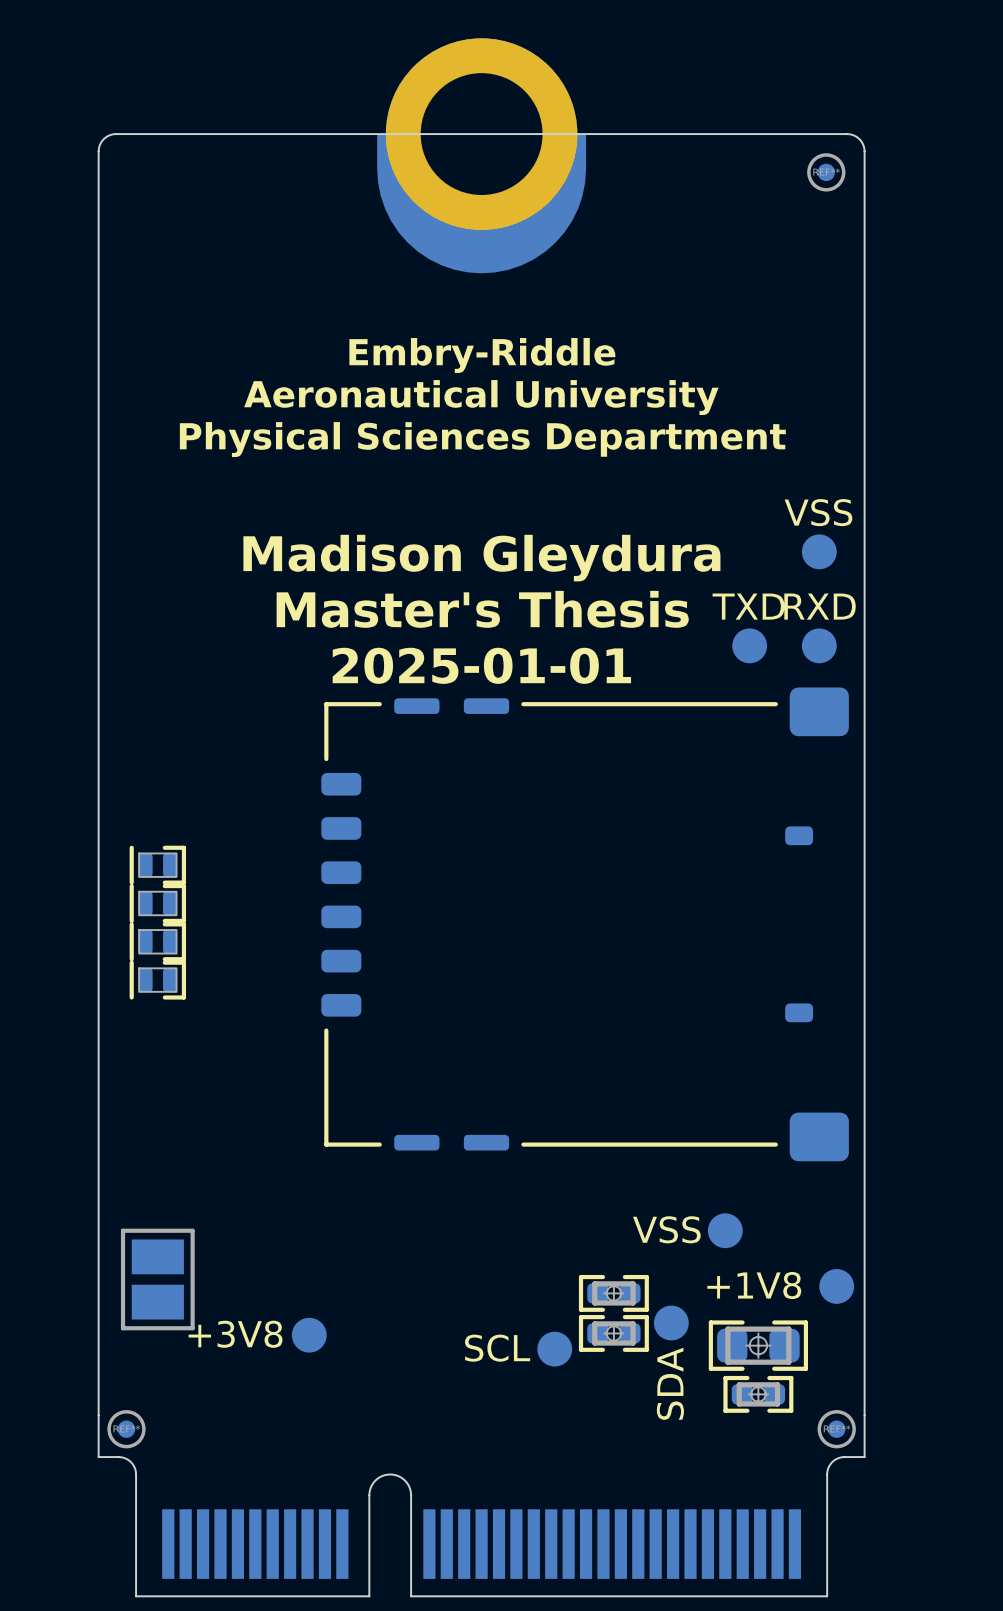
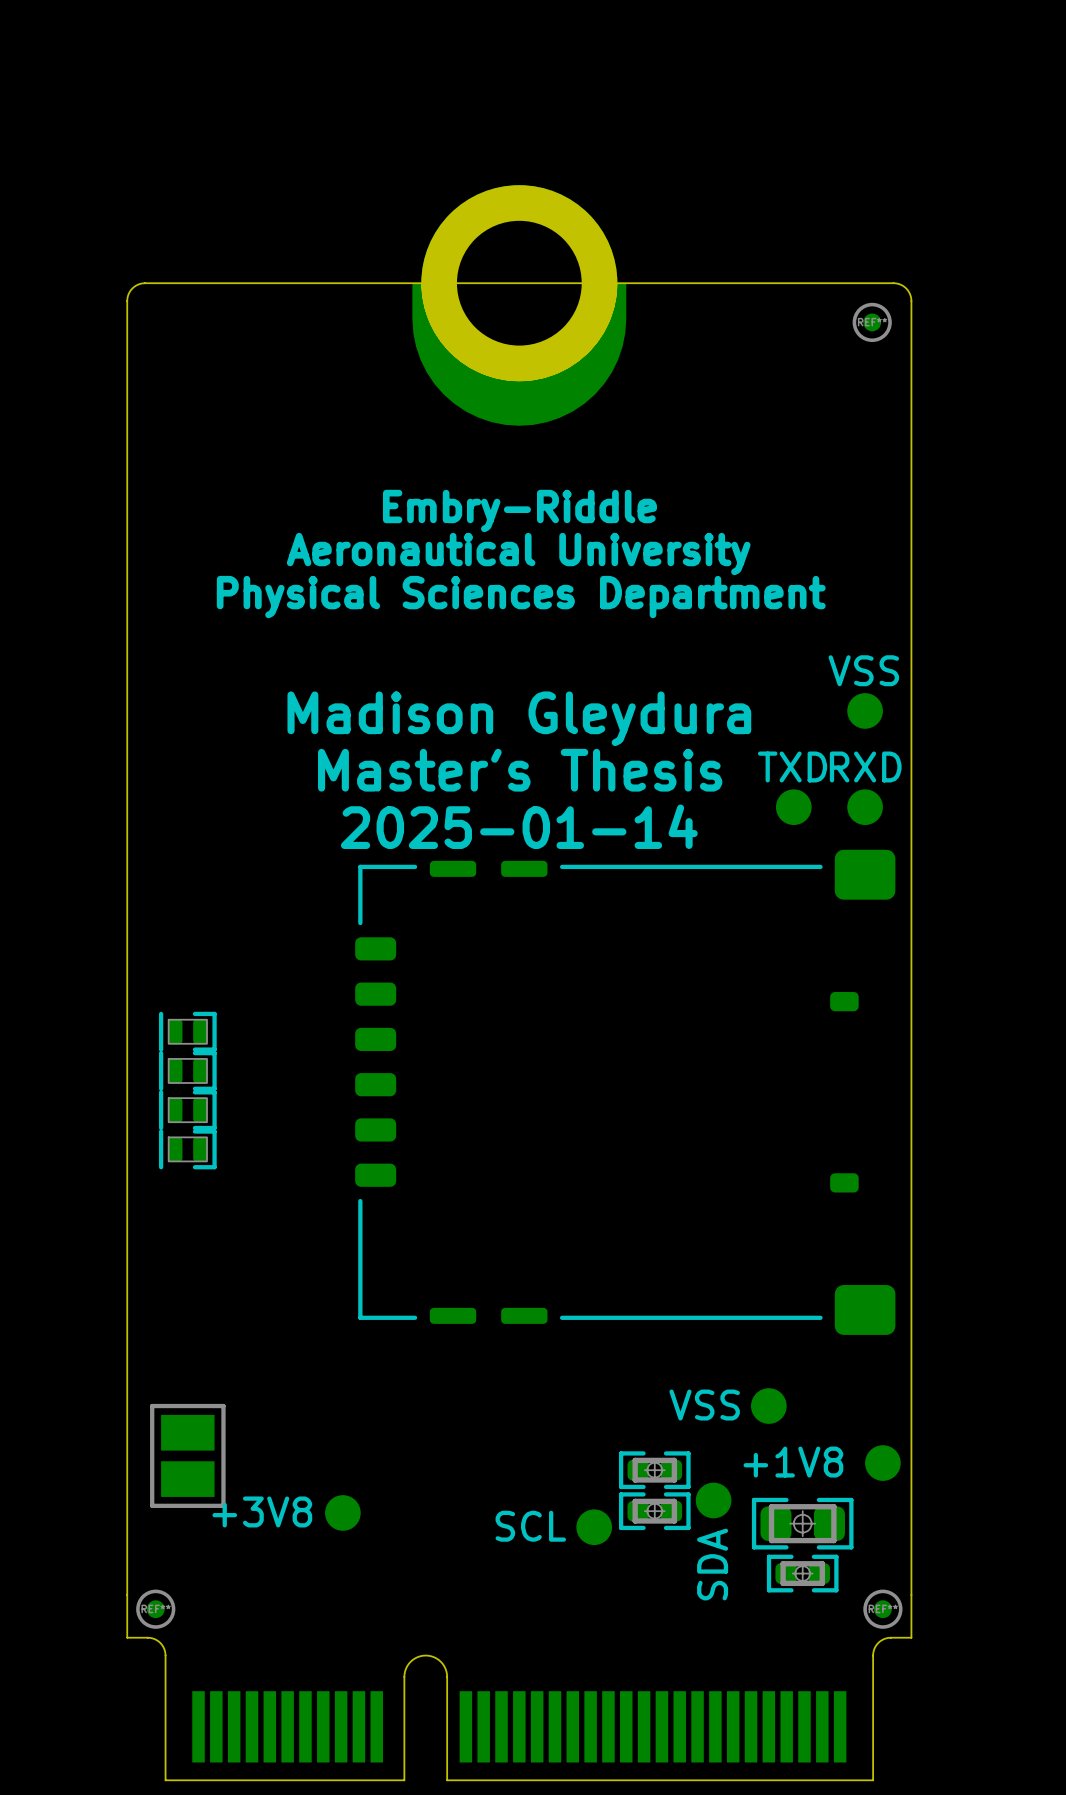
text: 2025-01-01 (481, 665) -> 2025-01-14 (519, 826)

